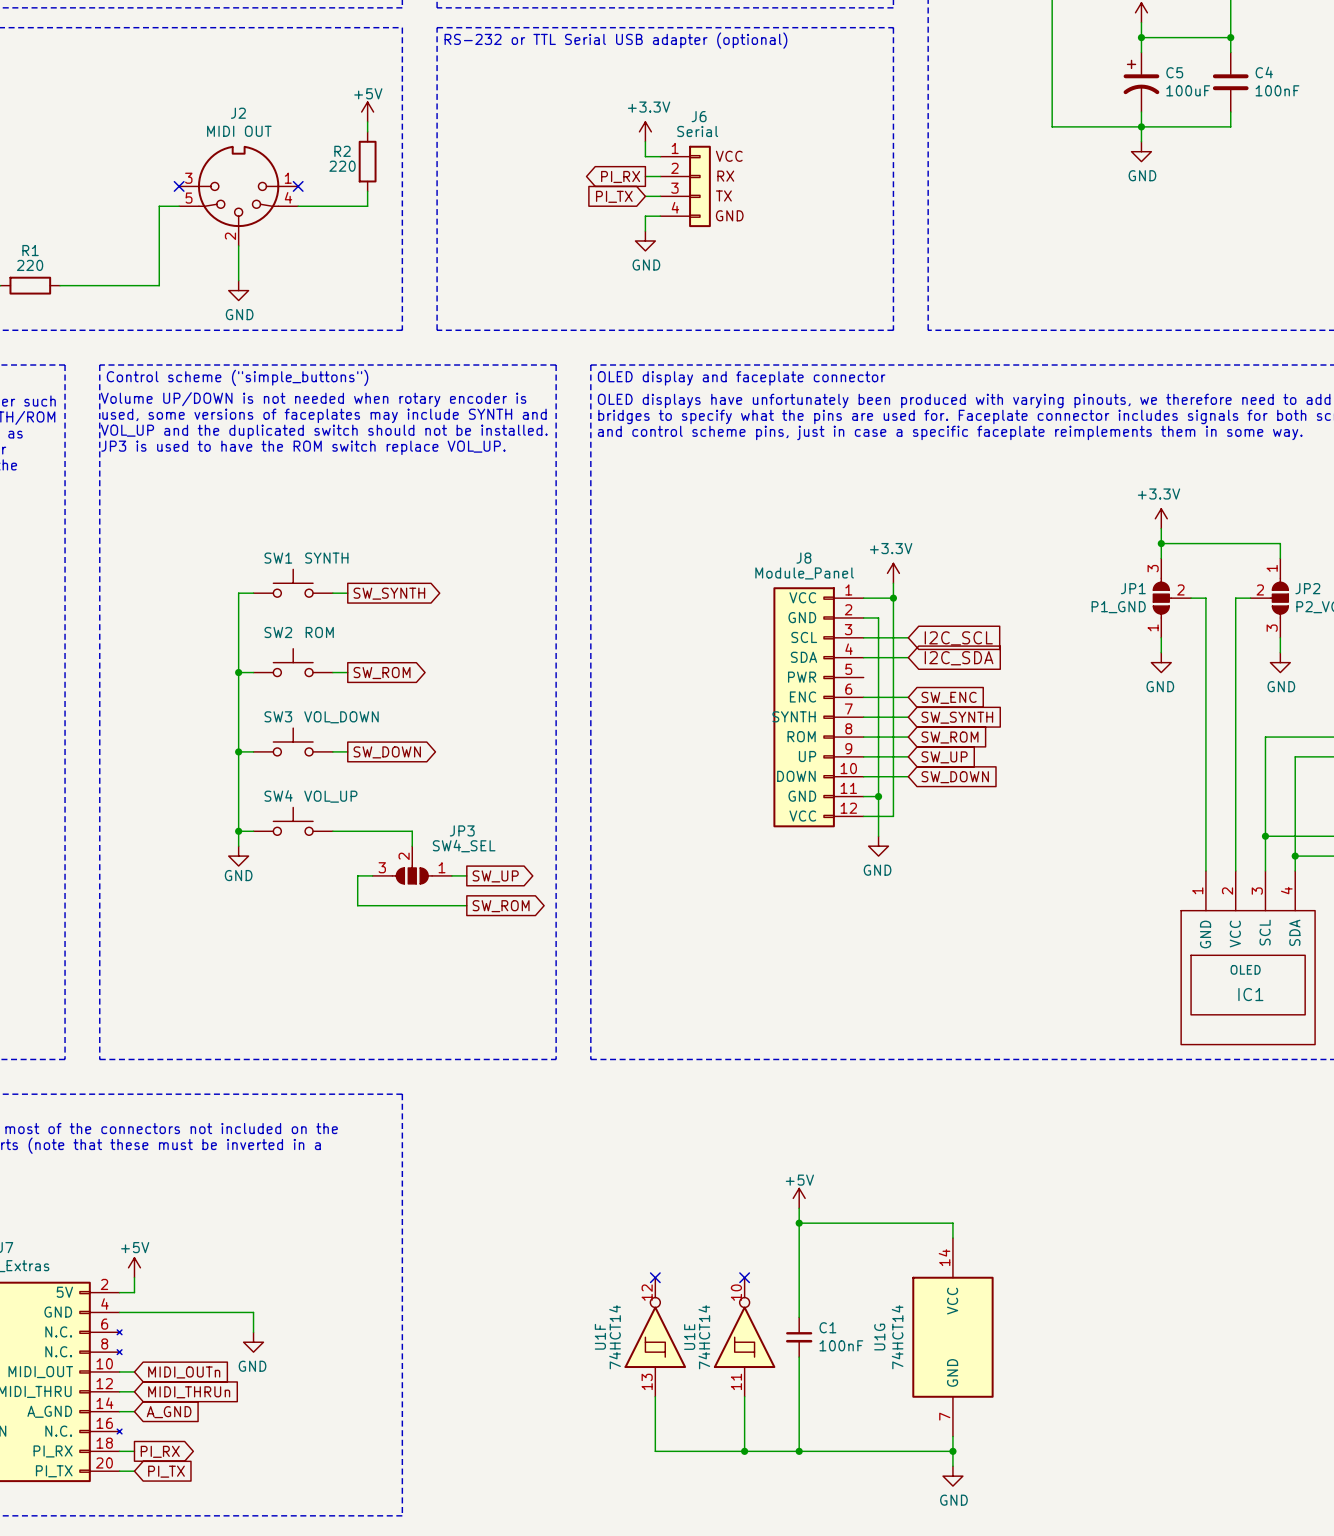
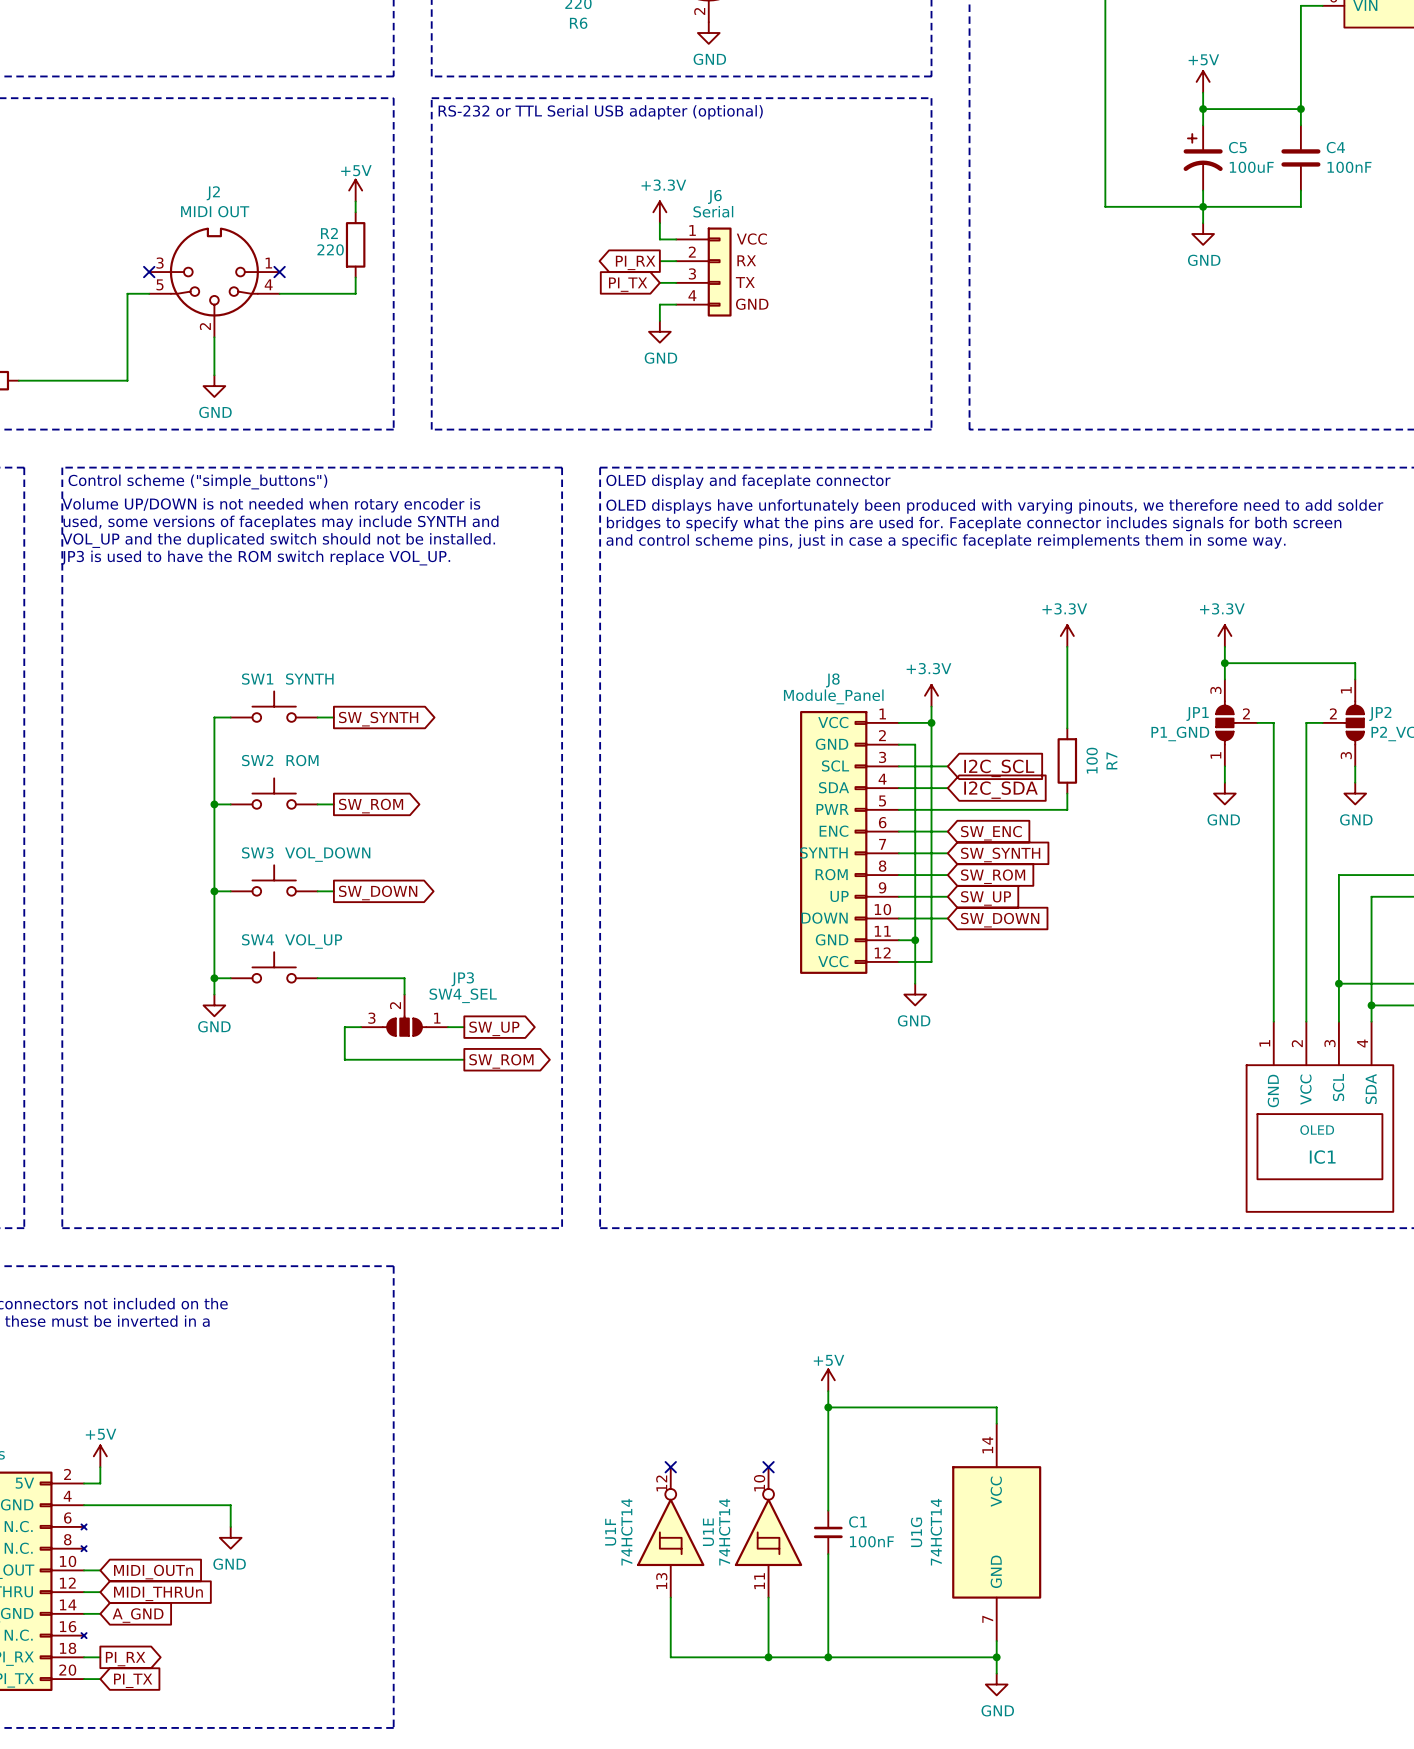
power symbol: none -> +3.3V (1067, 636)
wire: none -> (1067, 646) (1067, 728)
R7: none -> 100 (1067, 760)
wire: none -> (1067, 793) (1067, 809) (898, 809)

